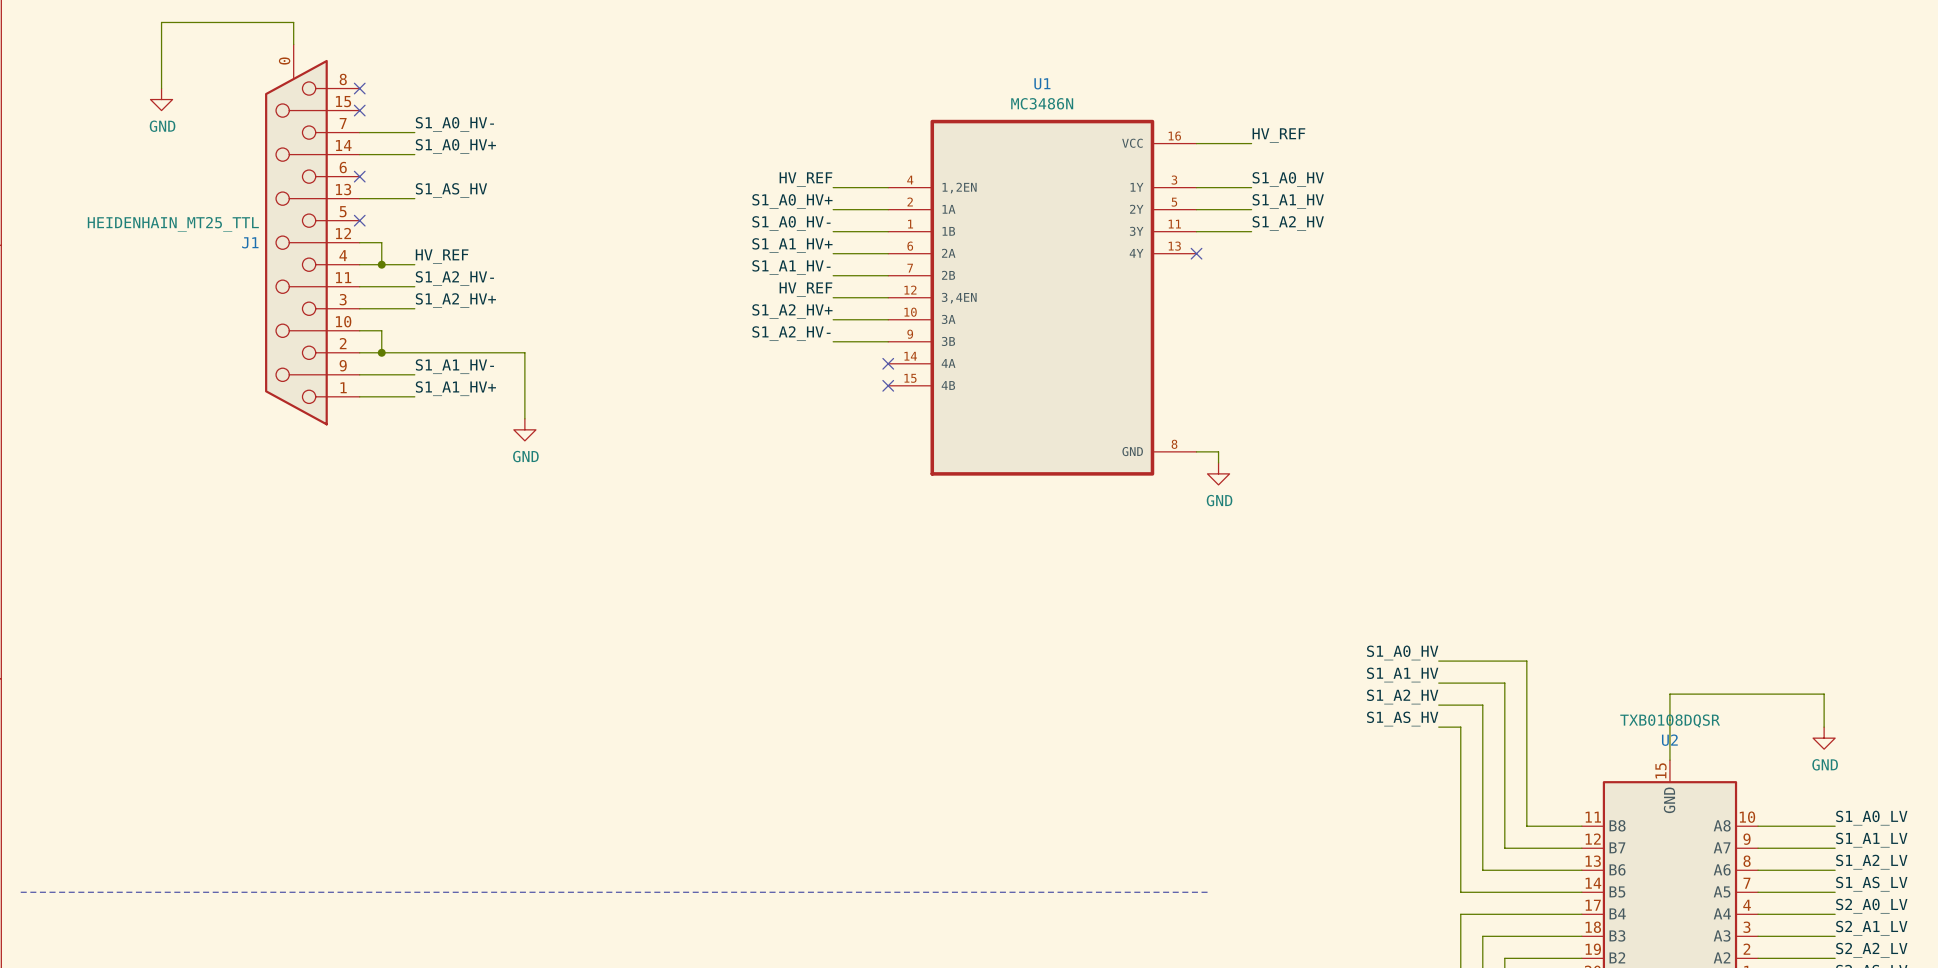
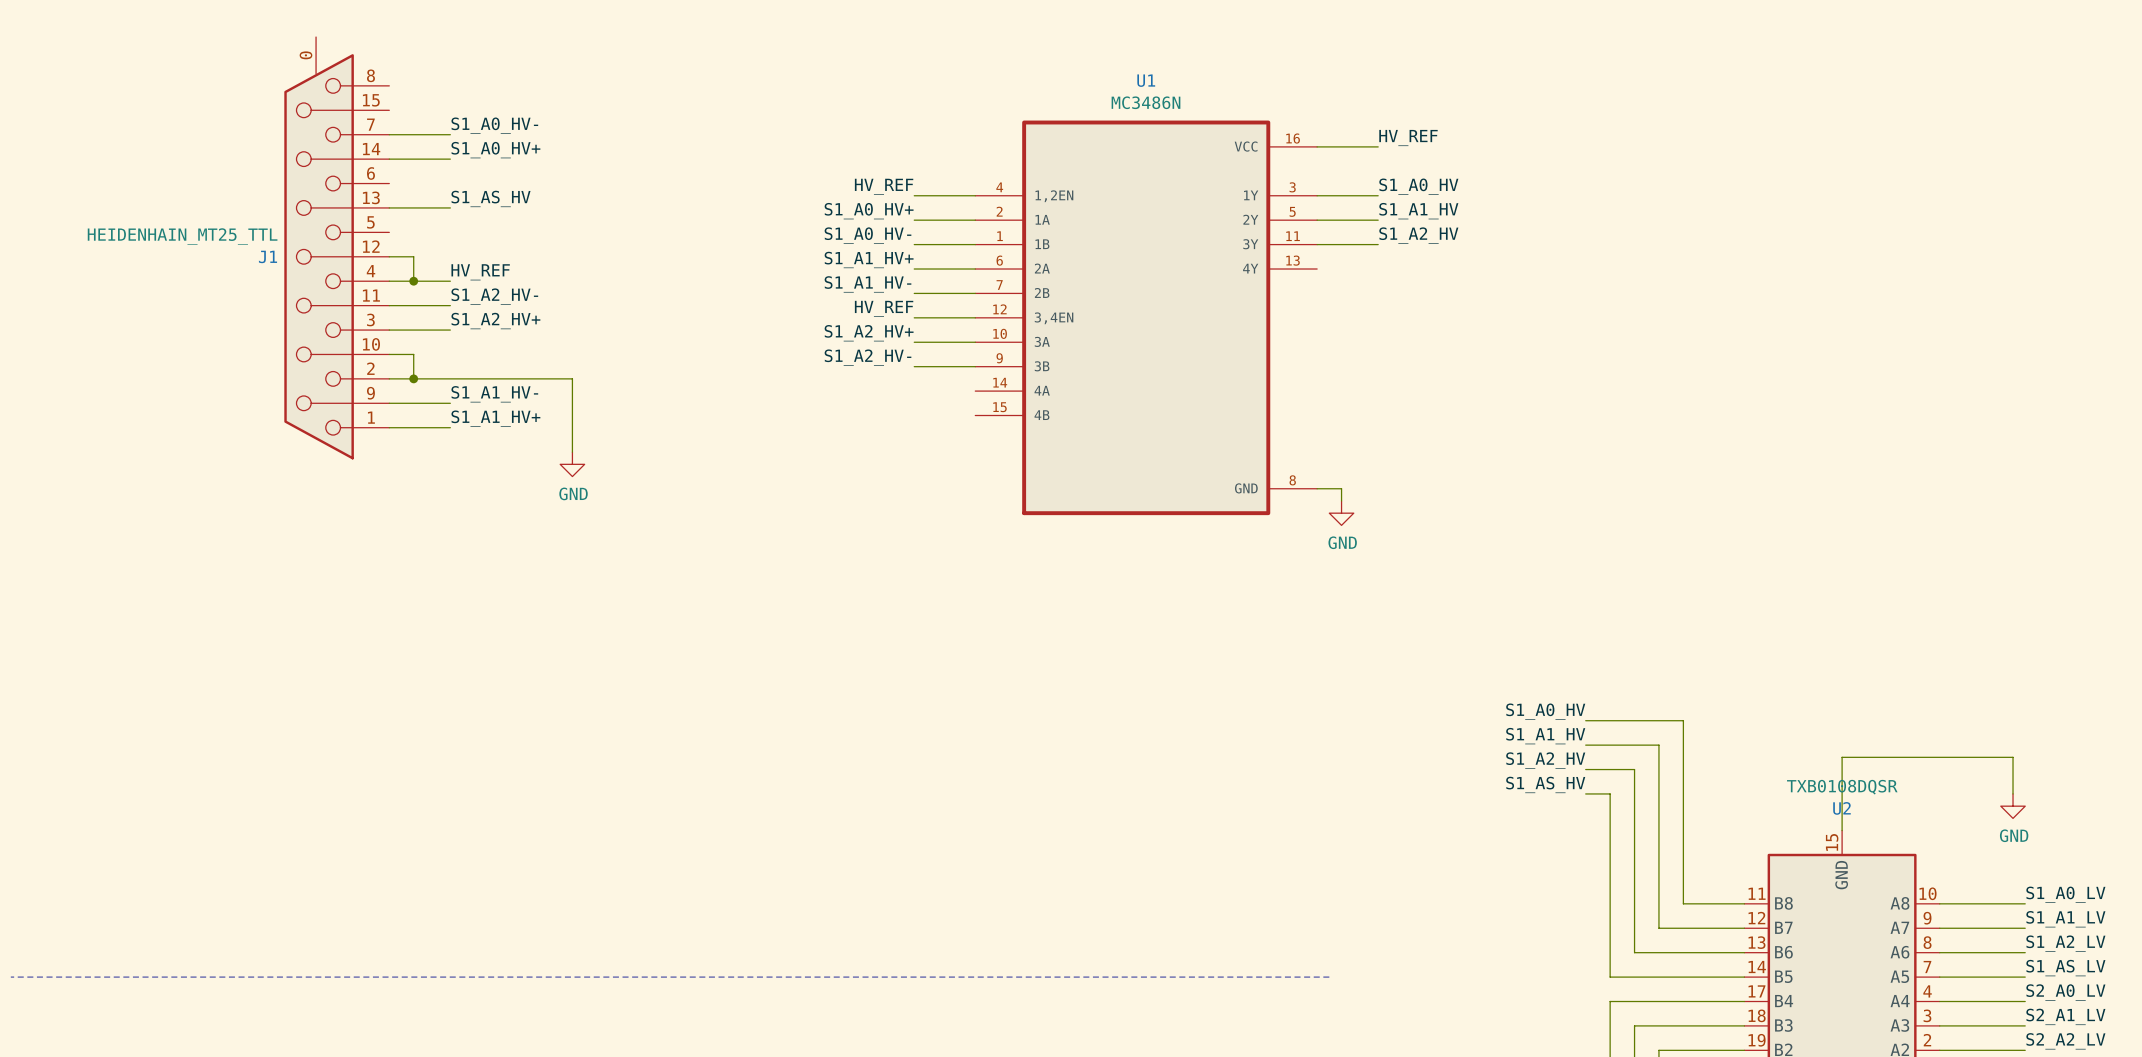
wire: (293, 44) (293, 22) (161, 22) (161, 88) -> none
no-connect mark: (359, 88) -> none
power symbol: GND (161, 99) -> none
no-connect mark: (359, 110) -> none
no-connect mark: (359, 176) -> none
no-connect mark: (359, 220) -> none
no-connect mark: (1196, 253) -> none
no-connect mark: (888, 363) -> none
no-connect mark: (888, 385) -> none

